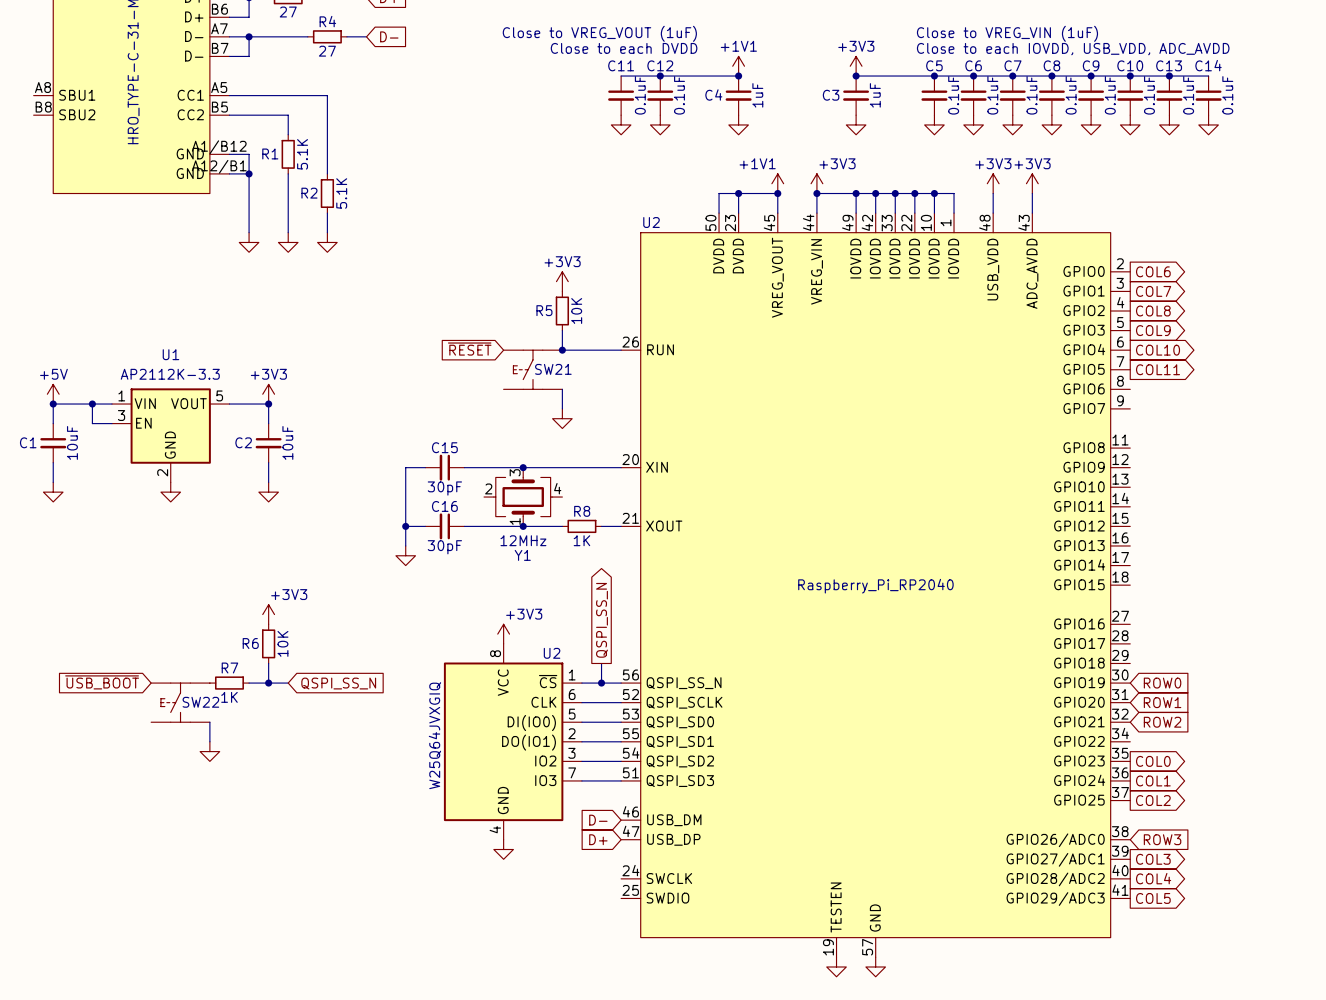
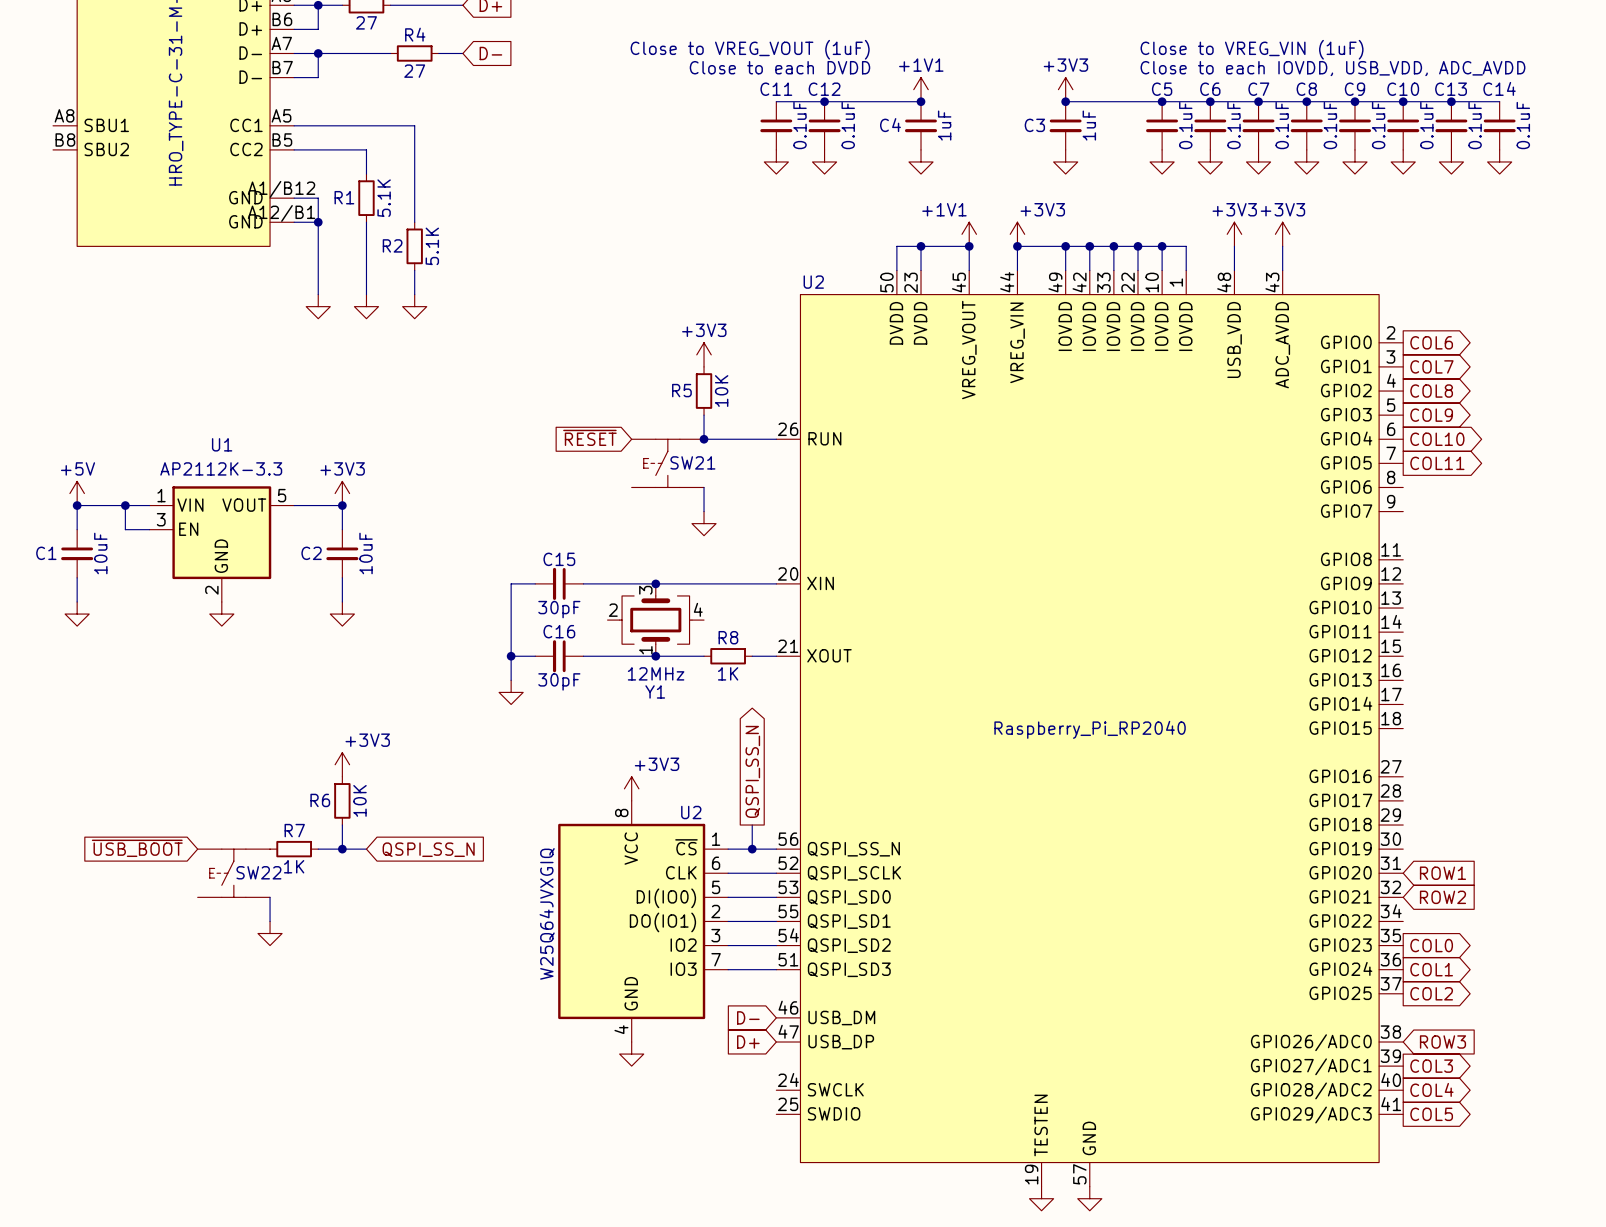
global label: ROW0 (1162, 683) -> none

